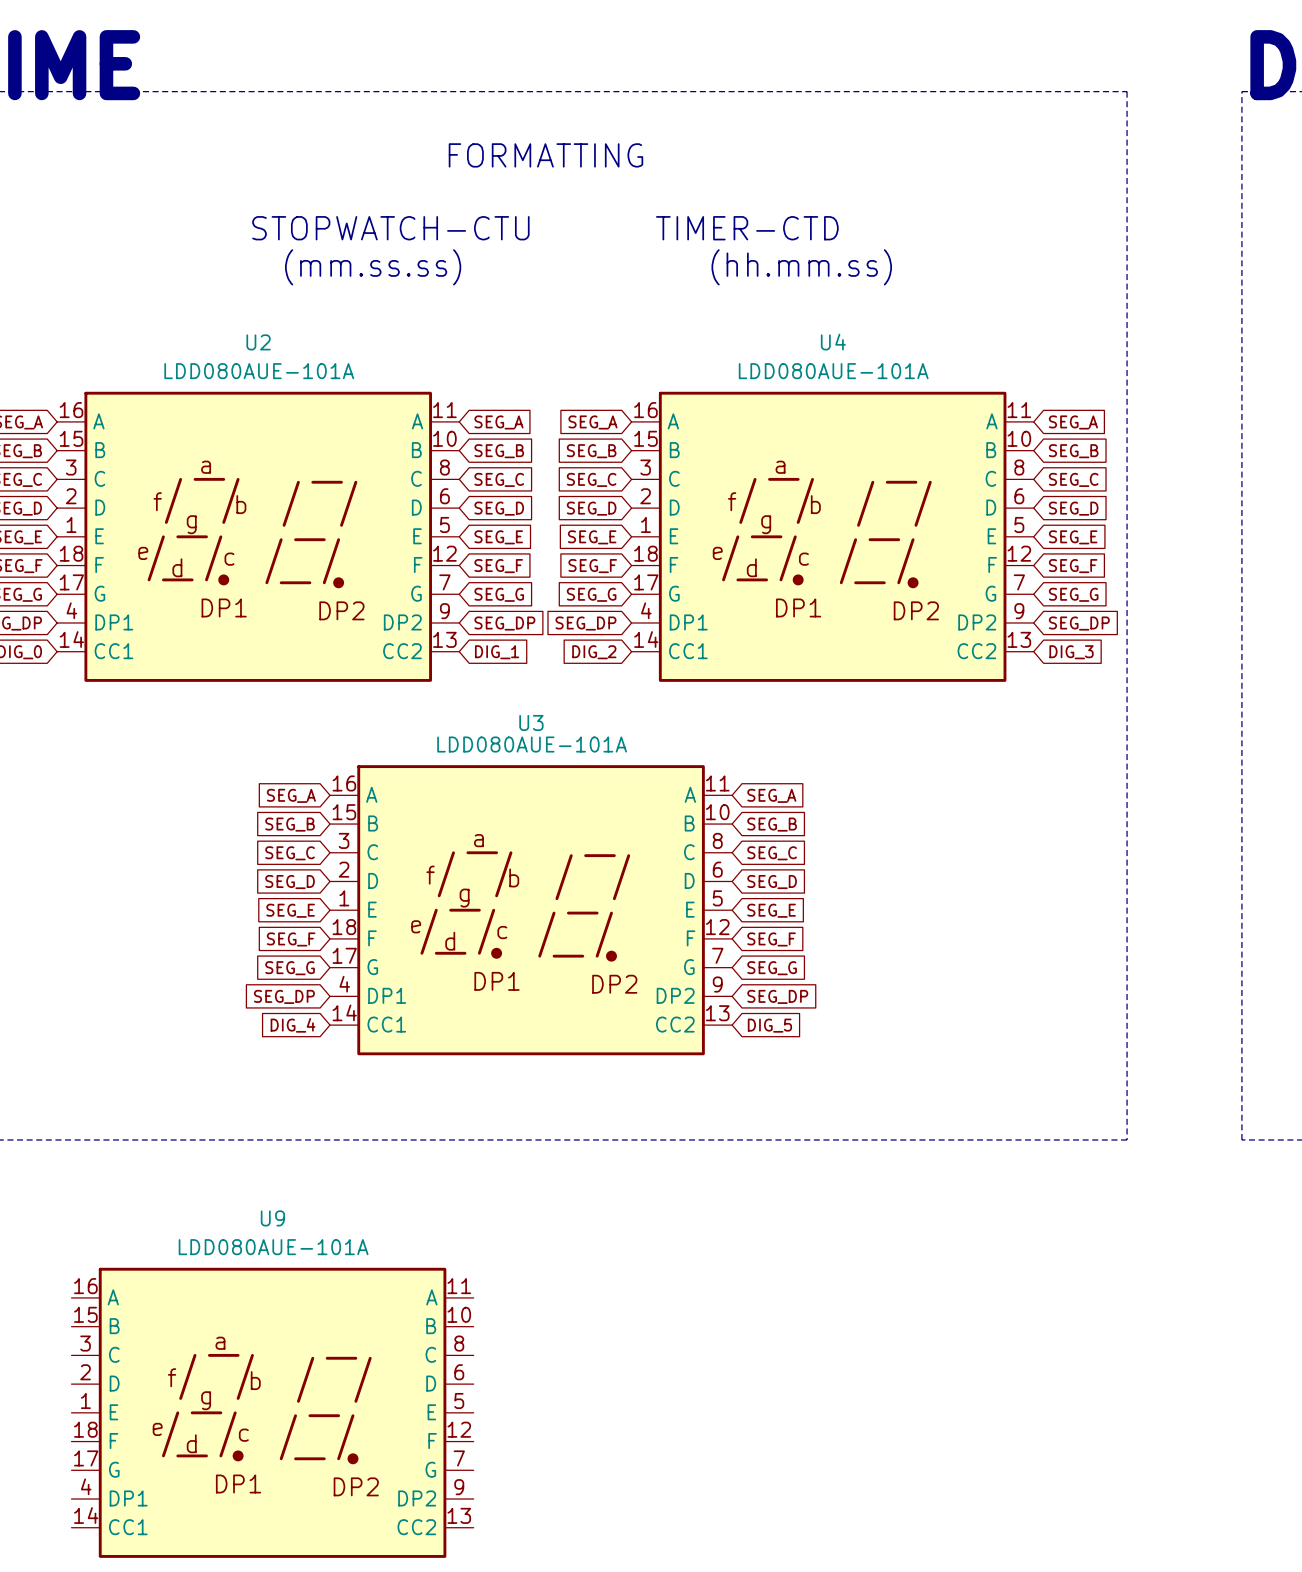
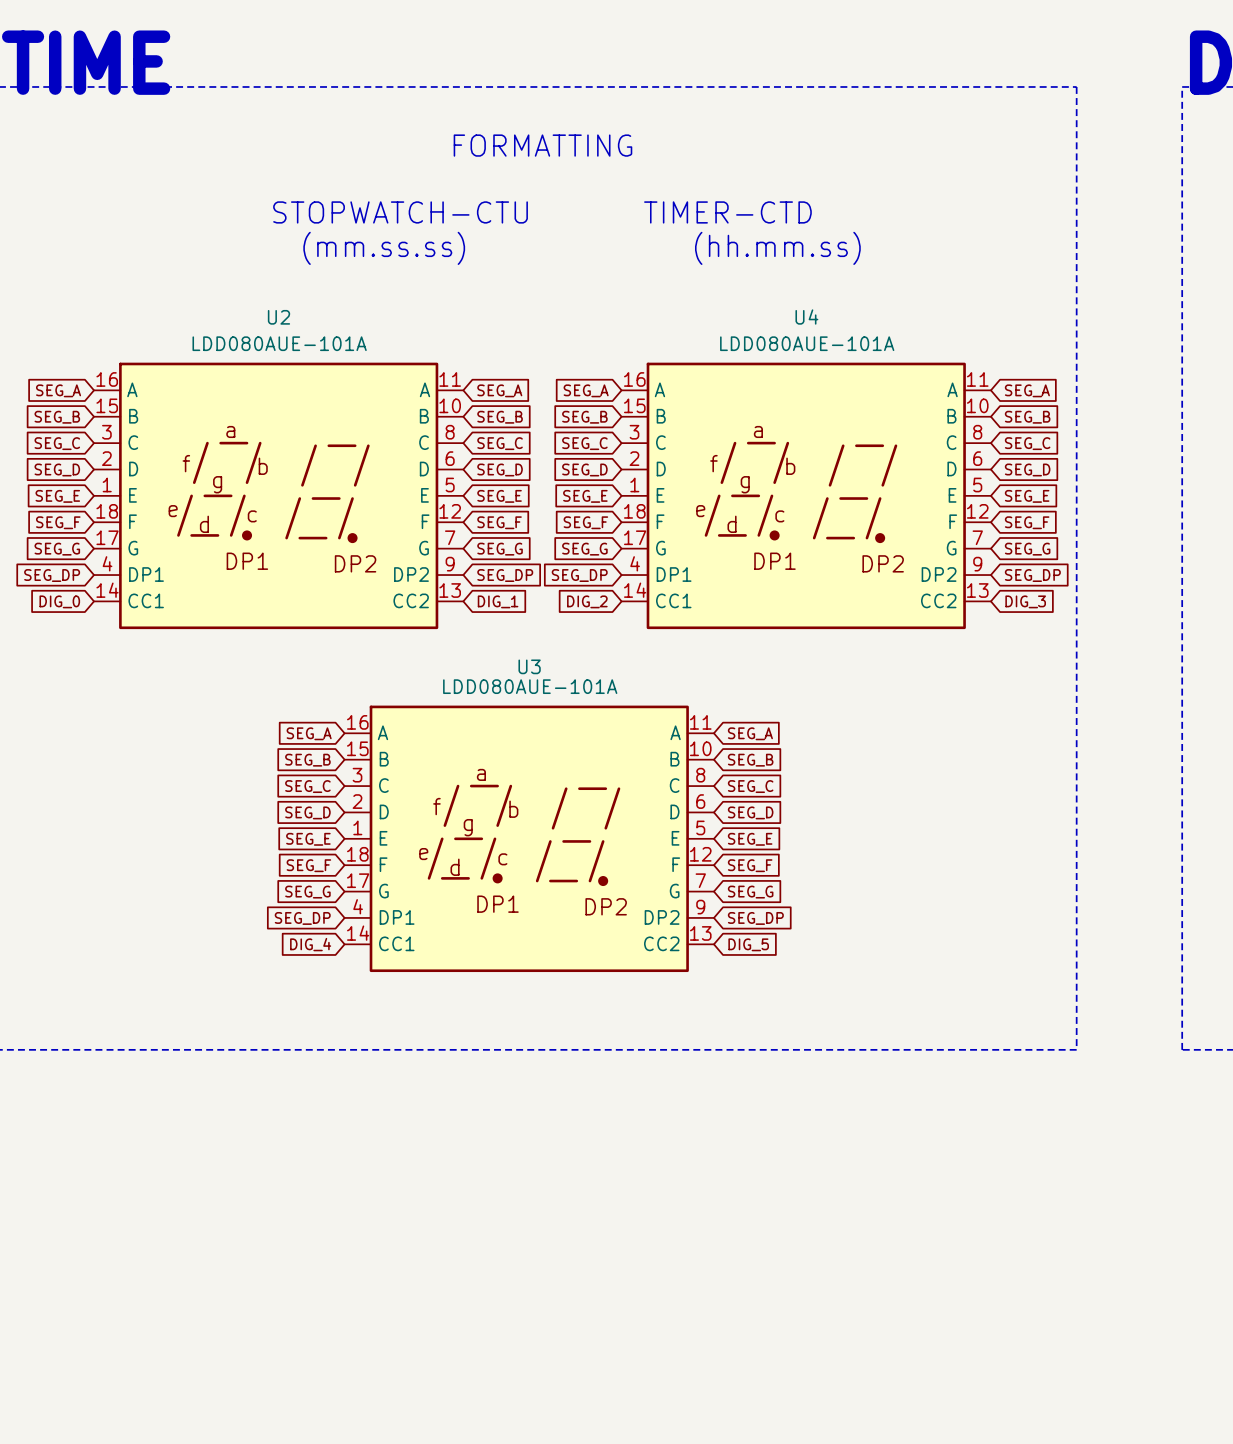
U9: LDD080AUE-101A (272, 1412) -> none

